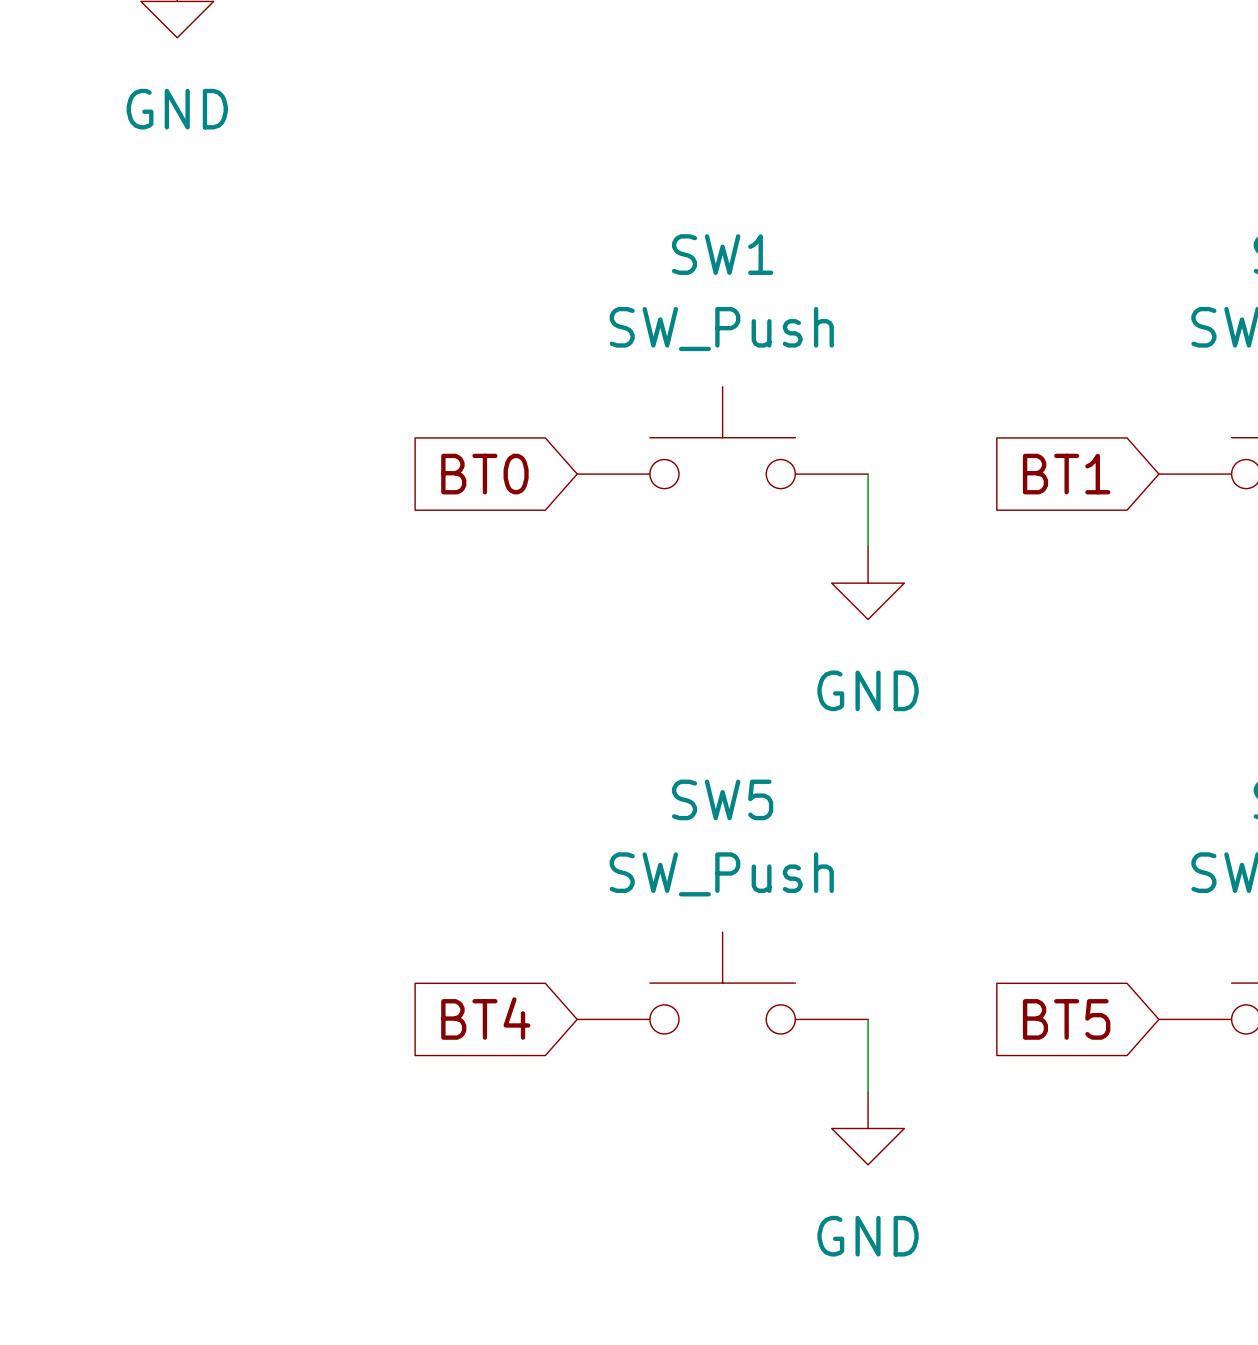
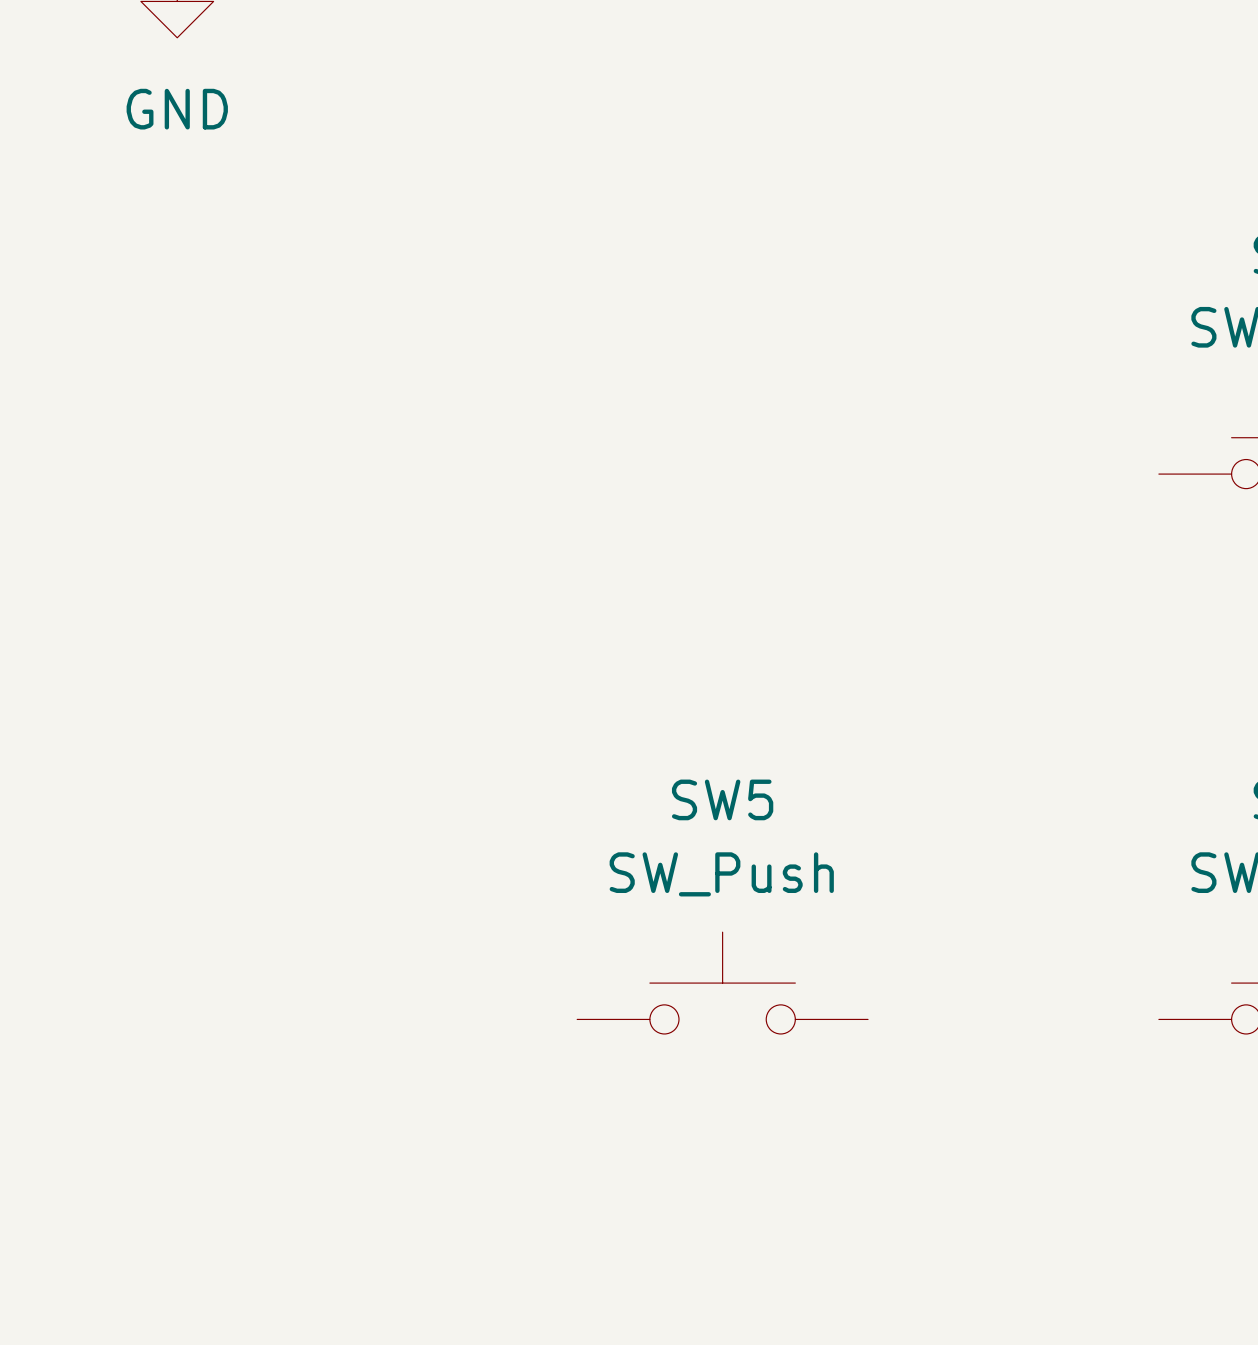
SW1: SW_Push (722, 437) -> none
global label: BT0 (484, 474) -> none
wire: (868, 474) (868, 546) -> none
global label: BT1 (1066, 474) -> none
power symbol: GND (868, 583) -> none
global label: BT4 (485, 1018) -> none
wire: (868, 1019) (868, 1092) -> none
global label: BT5 (1066, 1019) -> none
power symbol: GND (868, 1128) -> none

